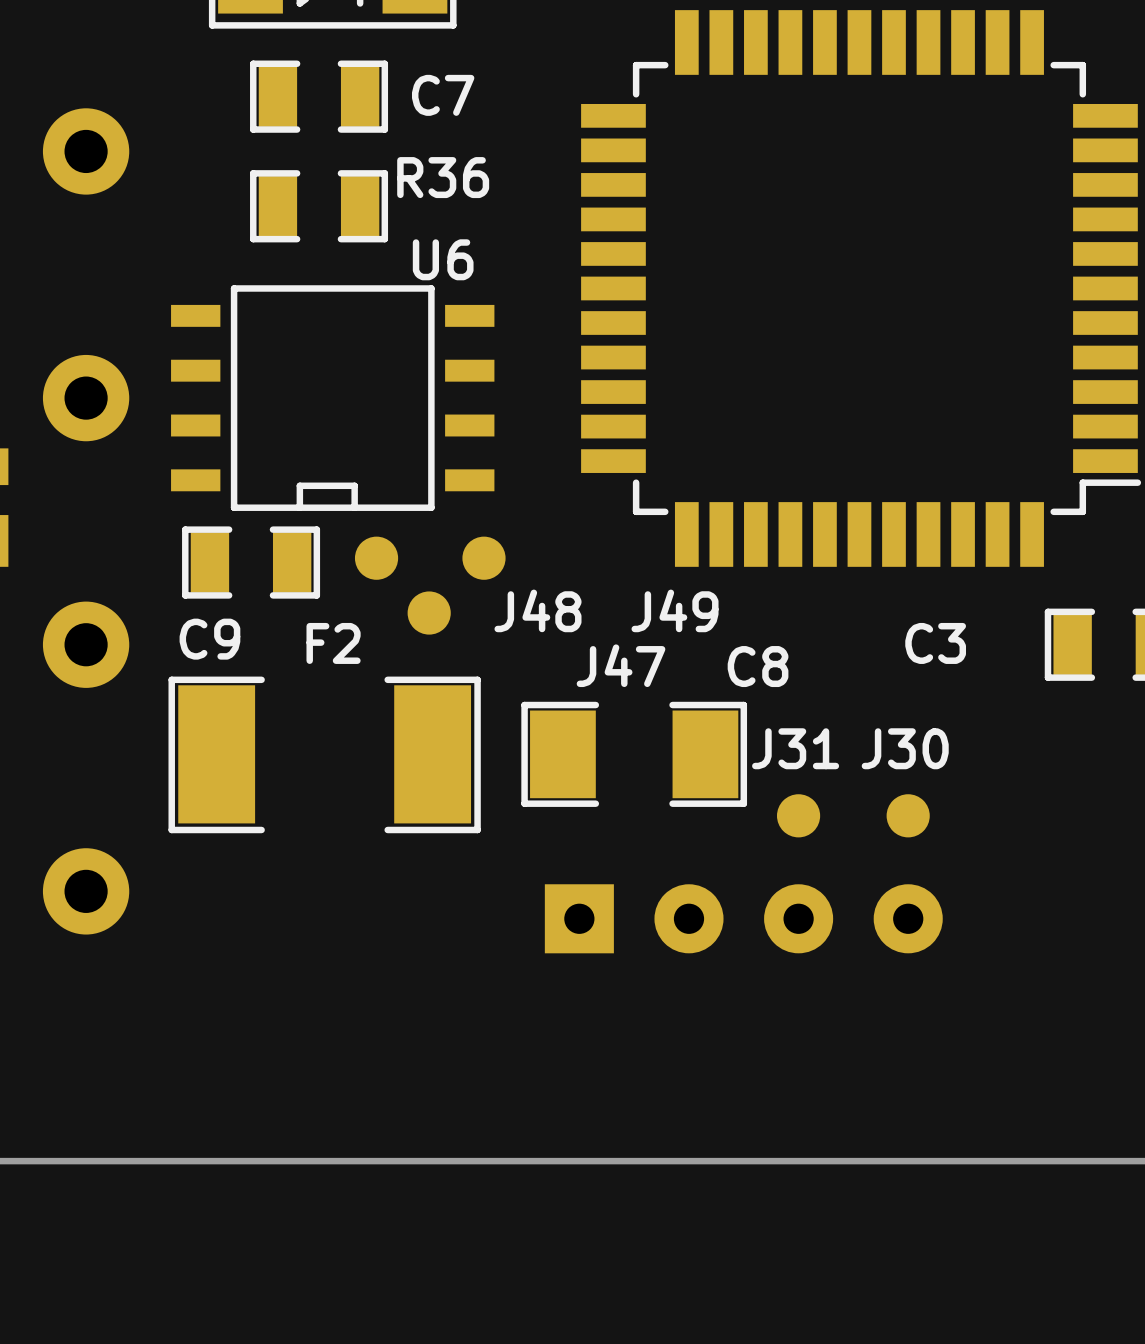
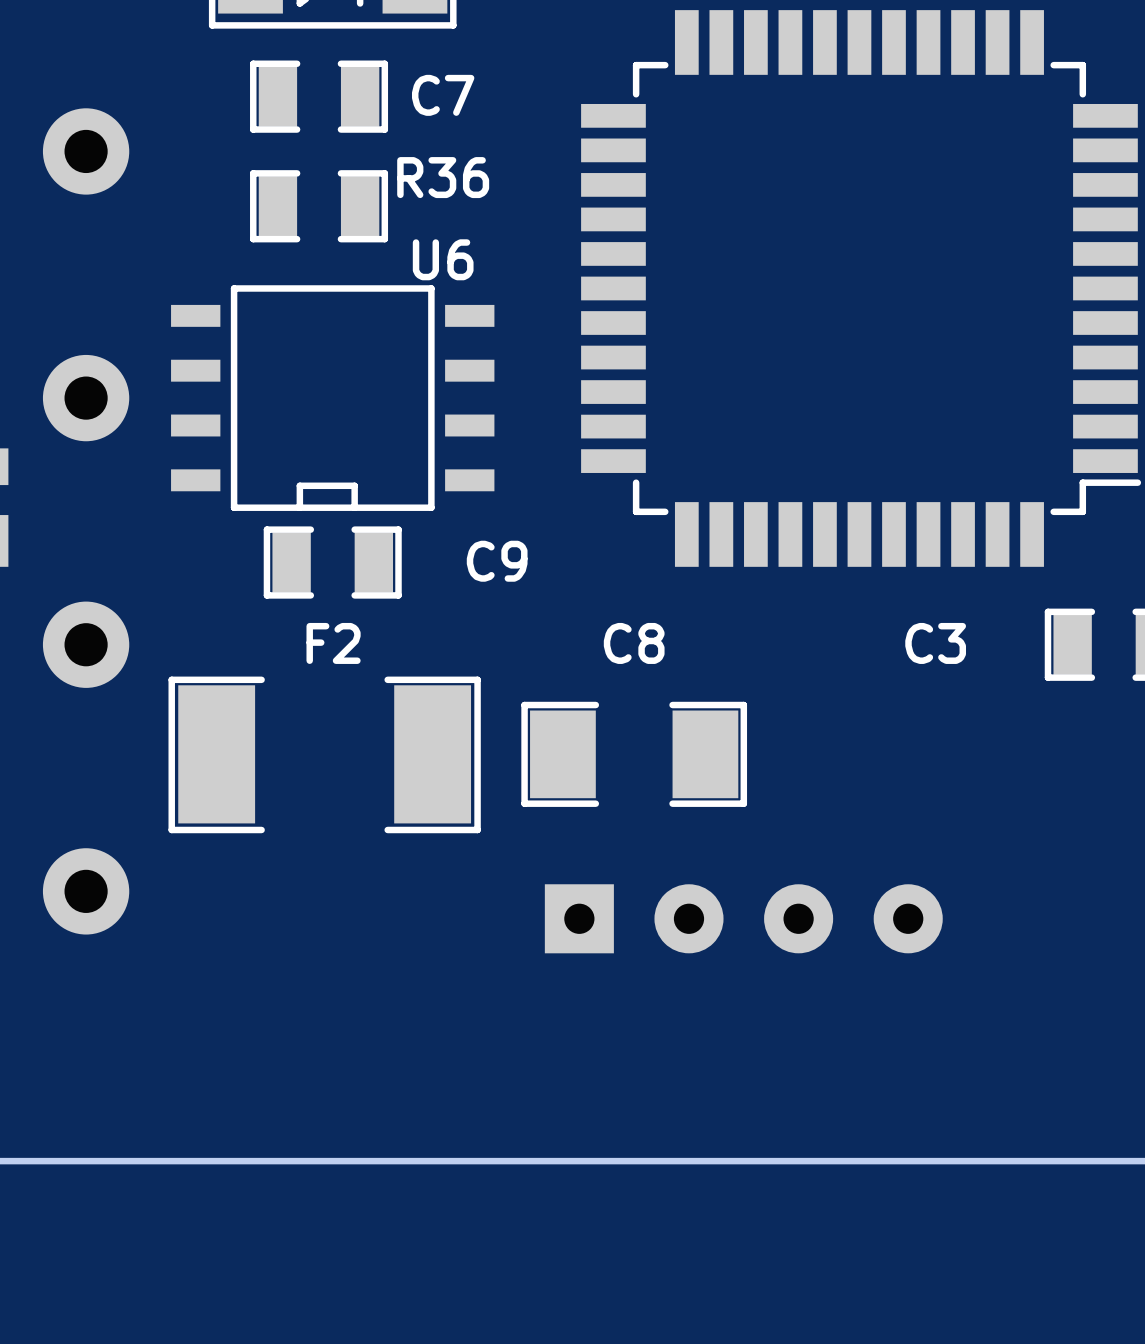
J48: (376, 558) -> none
J49: (483, 558) -> none
C9 position: (251, 562) -> (332, 562)
J47: (429, 613) -> none
C9 name position: C9 (209, 639) -> C9 (497, 561)
C8 name position: C8 (758, 666) -> C8 (634, 643)
J31: (798, 815) -> none
J30: (908, 815) -> none

